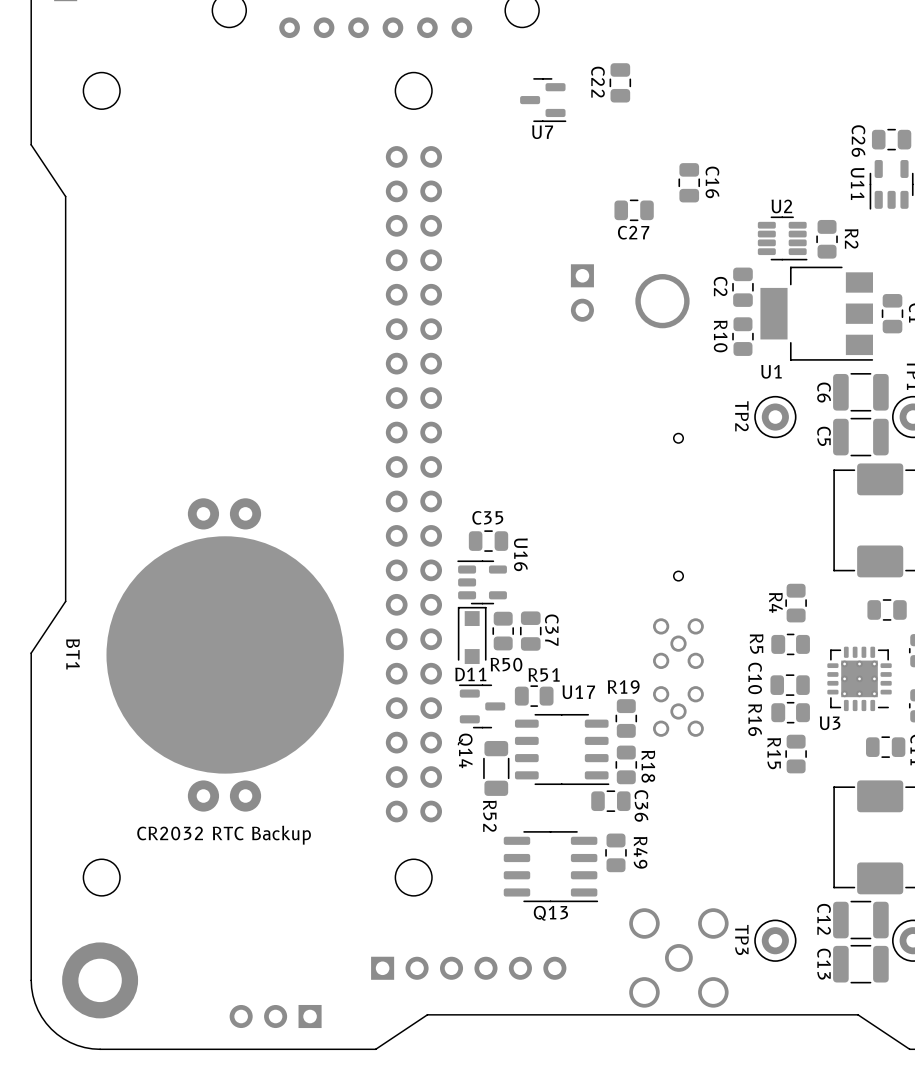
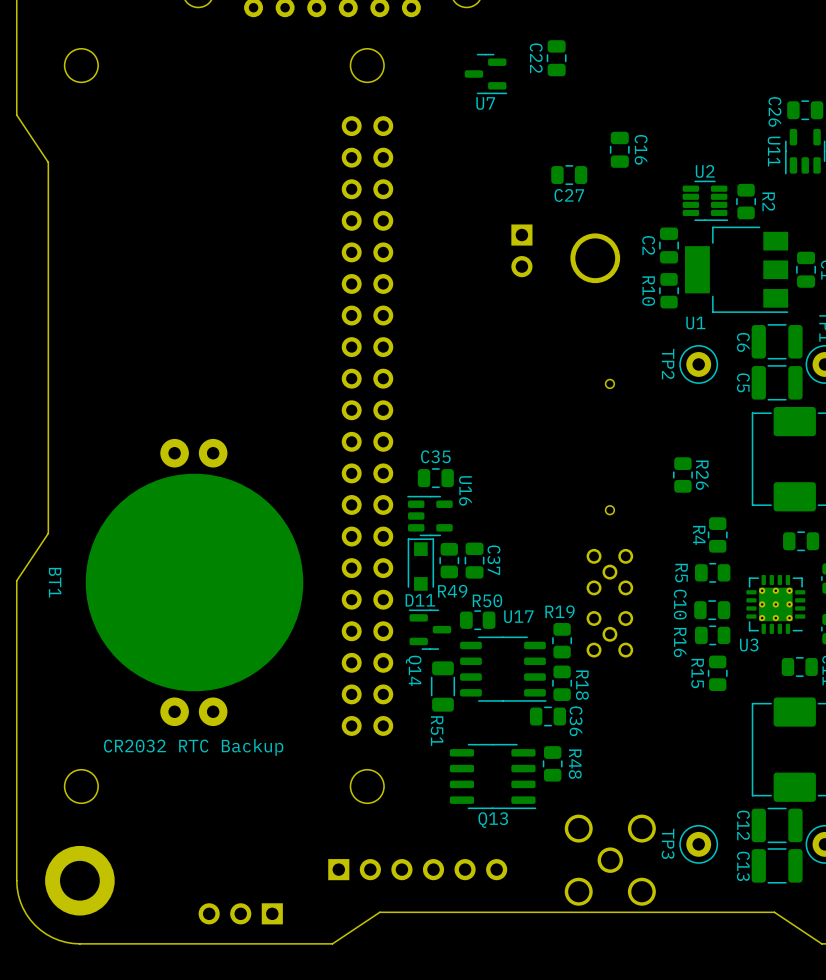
R26: none -> (682, 474)
R50 name: R50 (506, 664) -> R49 (452, 591)
R51 name: R51 (544, 674) -> R50 (487, 600)
R52 name: R52 (489, 816) -> R51 (437, 731)
R49 name: R49 (640, 852) -> R48 (575, 764)

